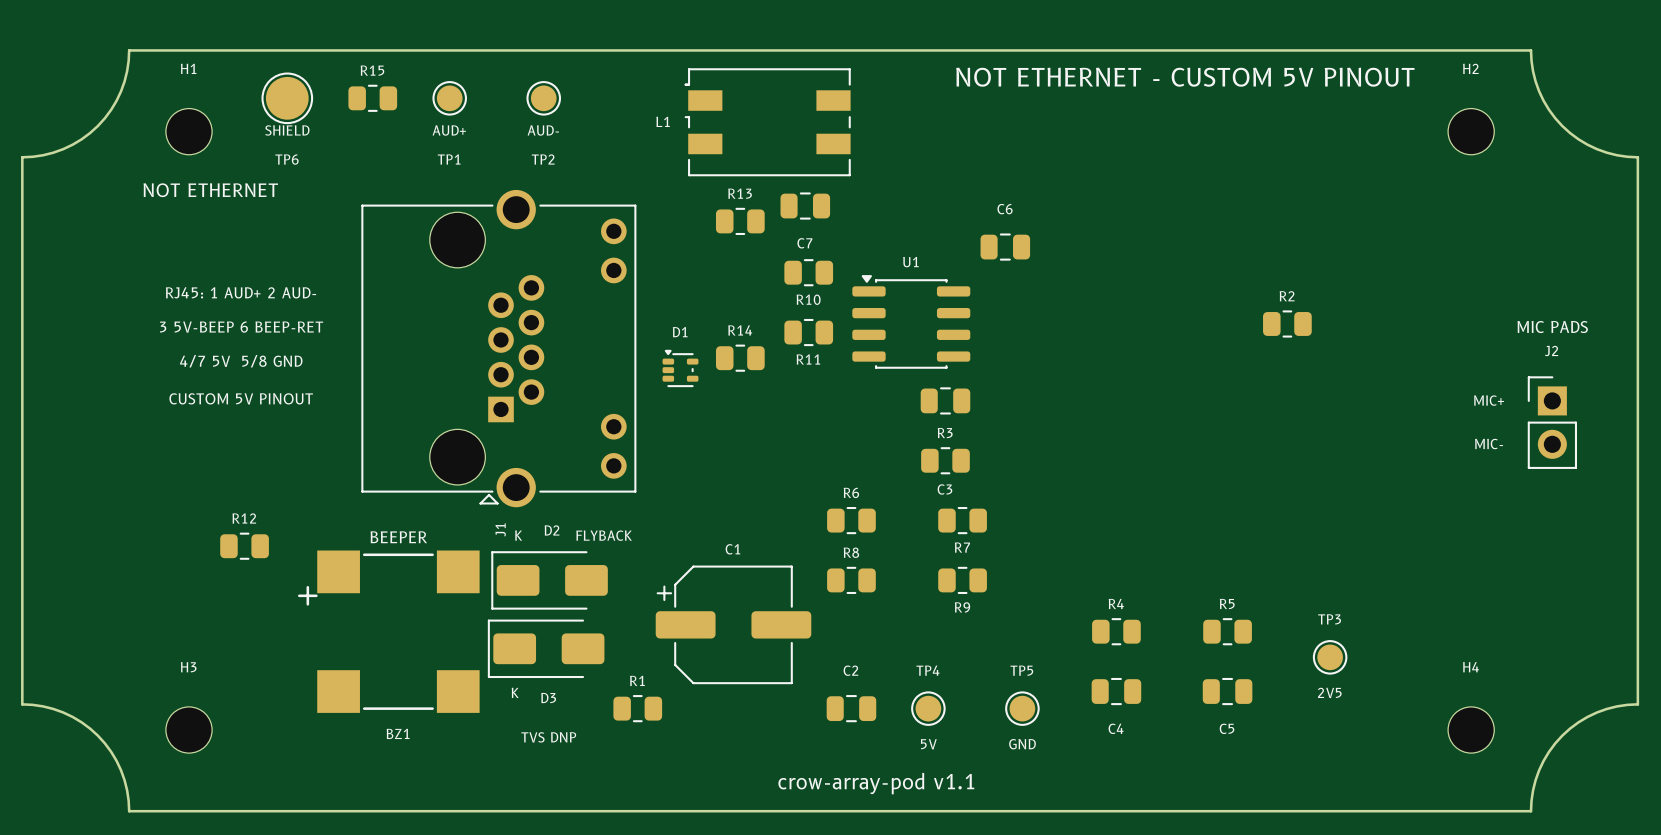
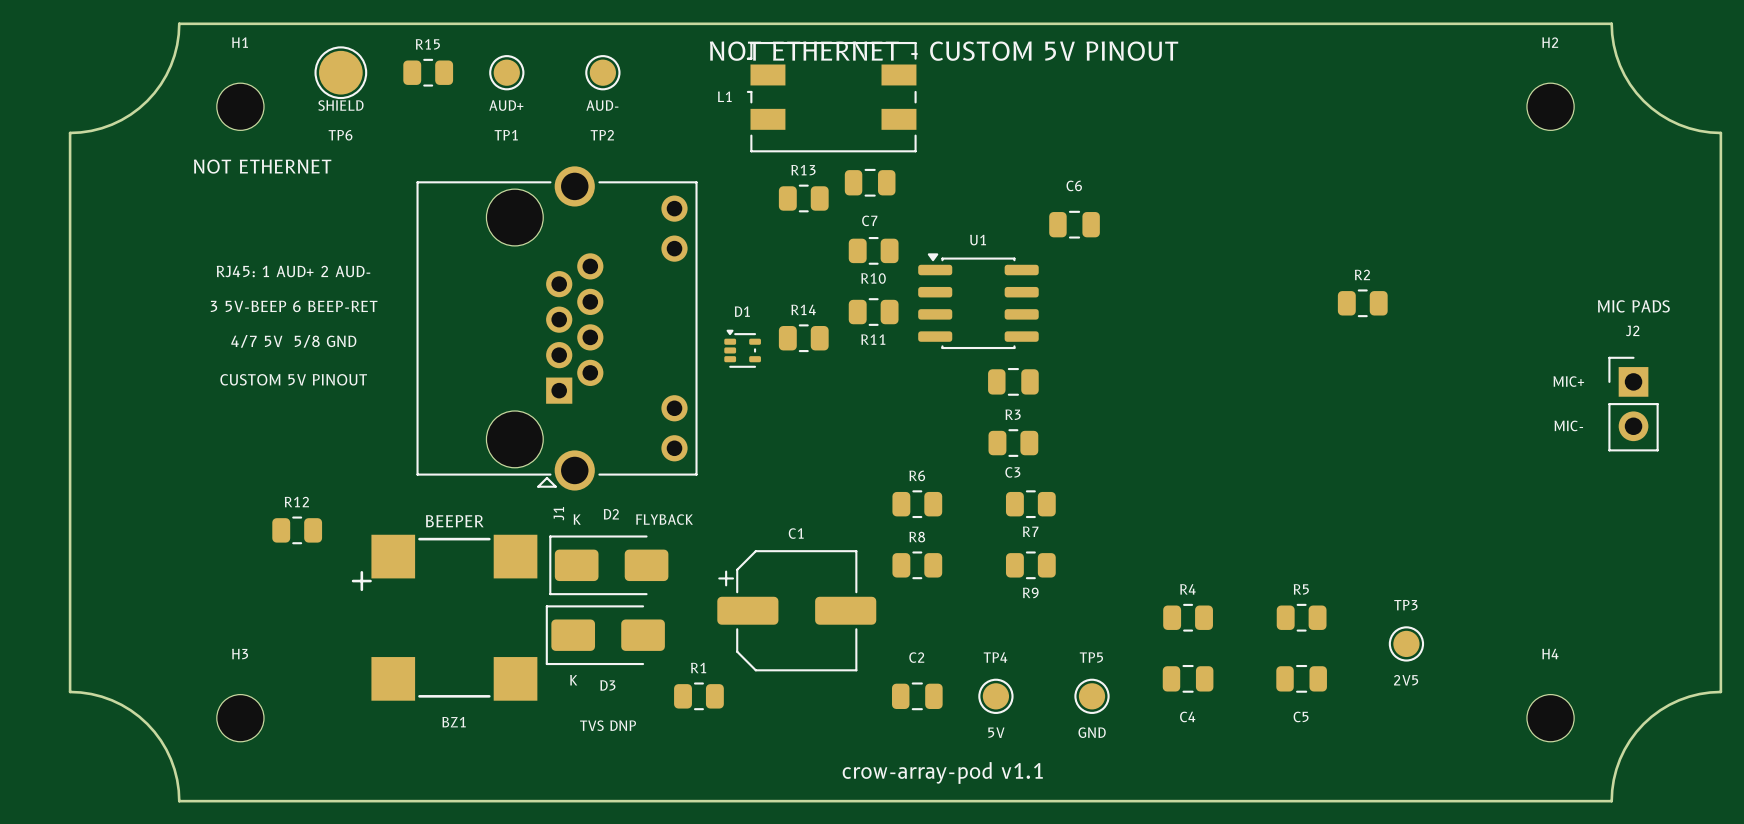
text position: NOT ETHERNET - CUSTOM 5V PINOUT (1185, 77) -> NOT ETHERNET - CUSTOM 5V PINOUT (944, 51)

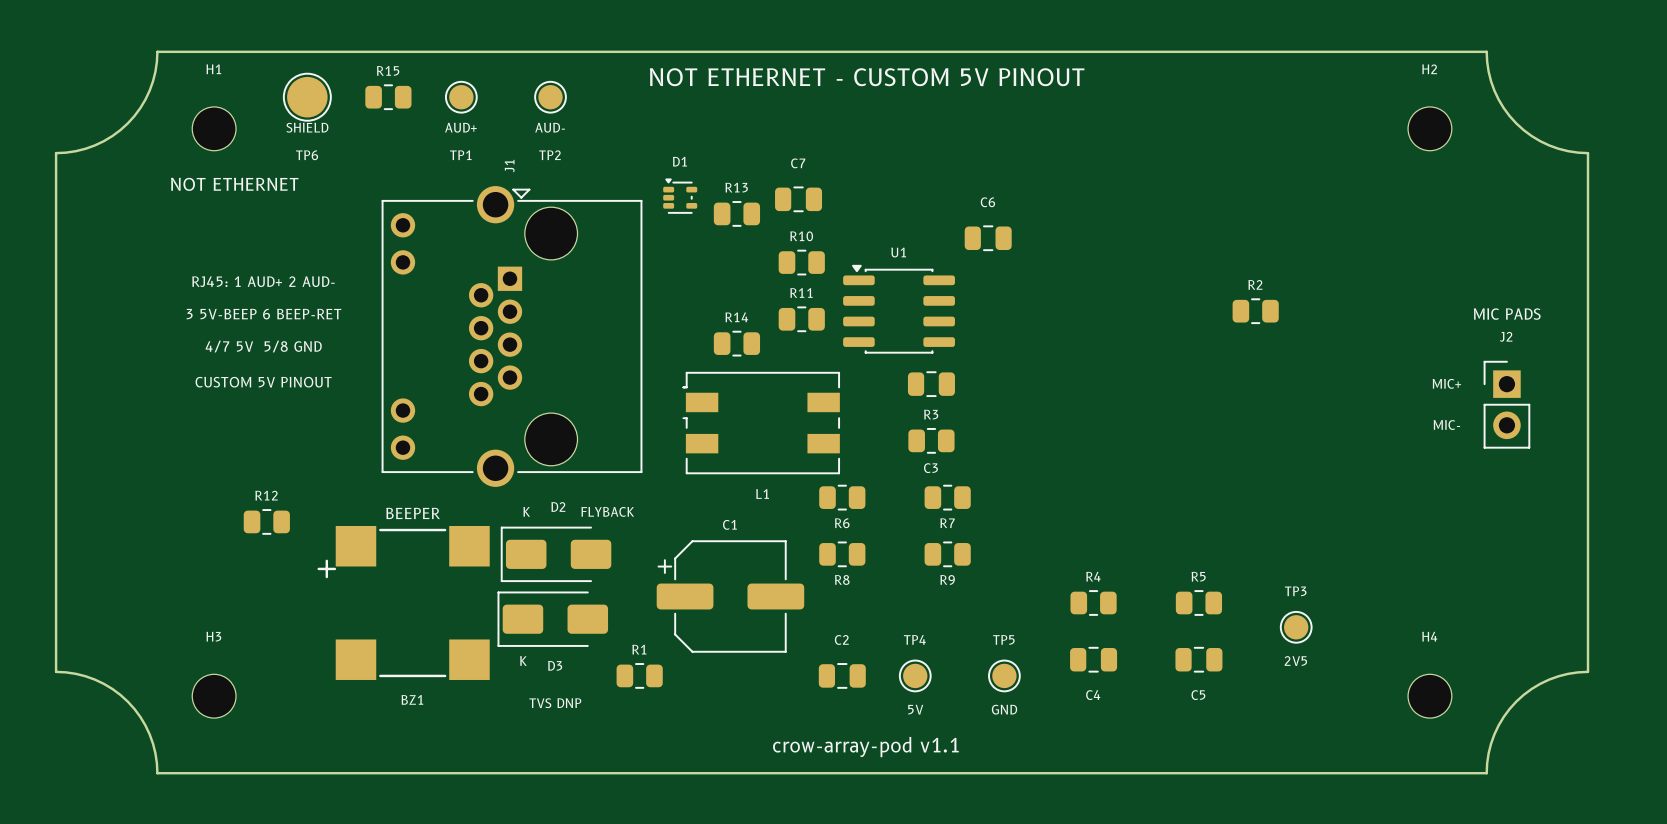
L1 name position: L1 (724, 96) -> L1 (762, 494)
L1 position: (831, 97) -> (761, 423)
C7 name position: C7 (869, 220) -> C7 (798, 163)
R10 name position: R10 (873, 278) -> R10 (801, 236)
J1 rotation: 0° (557, 328) -> 180° (512, 336)
R11 name position: R11 (873, 339) -> R11 (801, 293)
D1 position: (742, 348) -> (680, 196)
R6 name position: R6 (917, 475) -> R6 (842, 523)
R8 name position: R8 (917, 537) -> R8 (842, 579)

